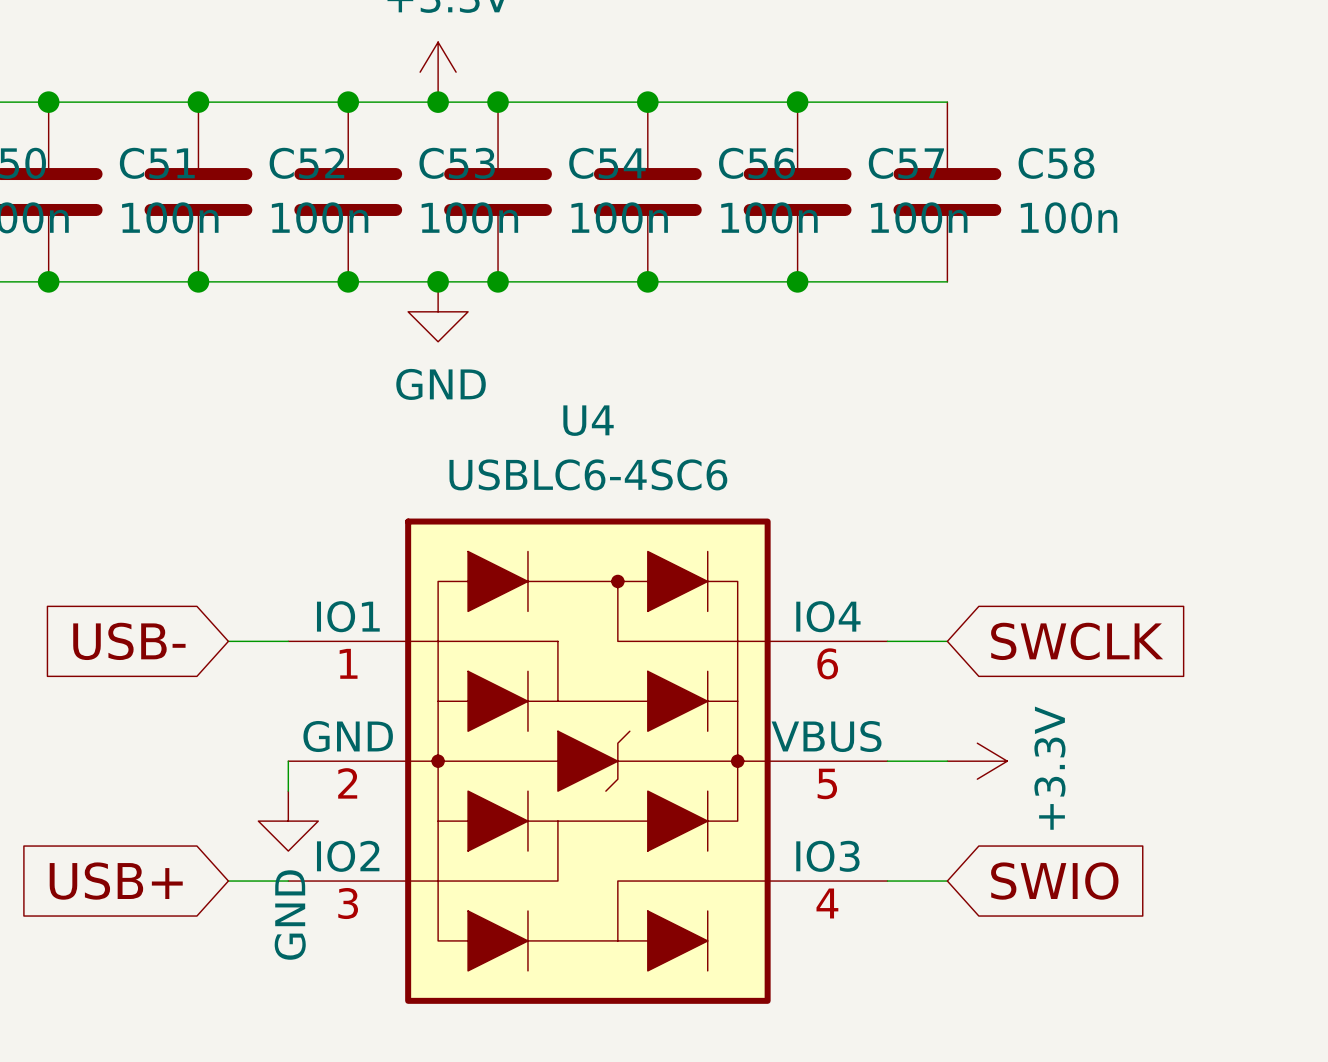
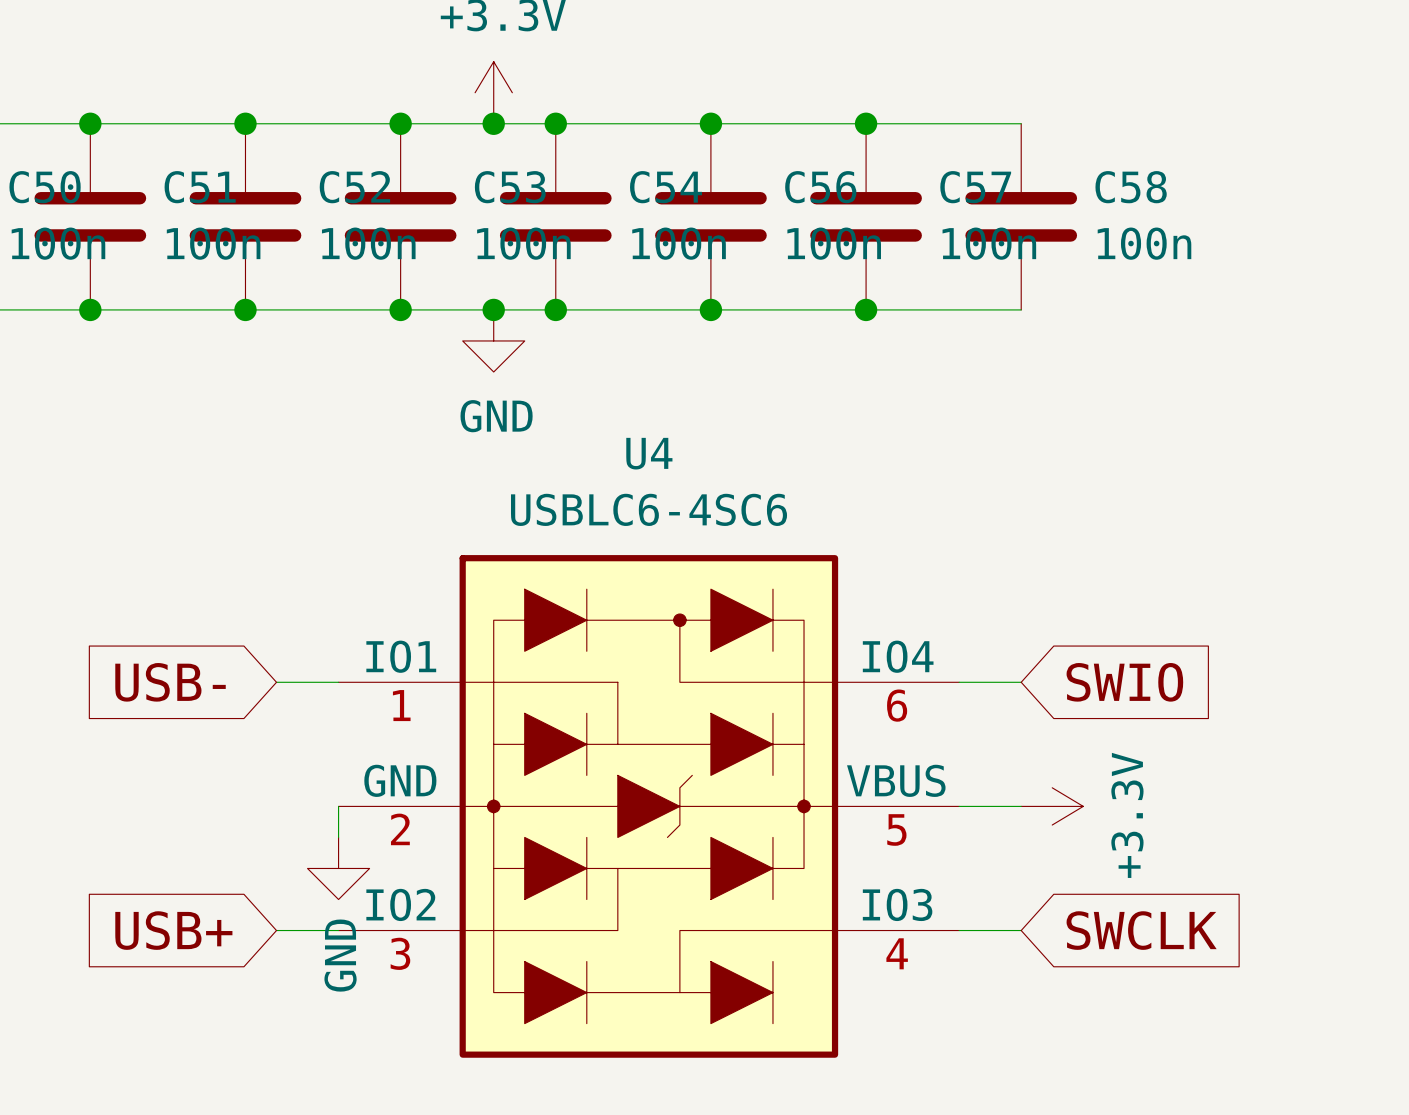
global label: SWCLK (1077, 641) -> SWIO (1124, 682)
global label: SWIO (1054, 881) -> SWCLK (1141, 930)

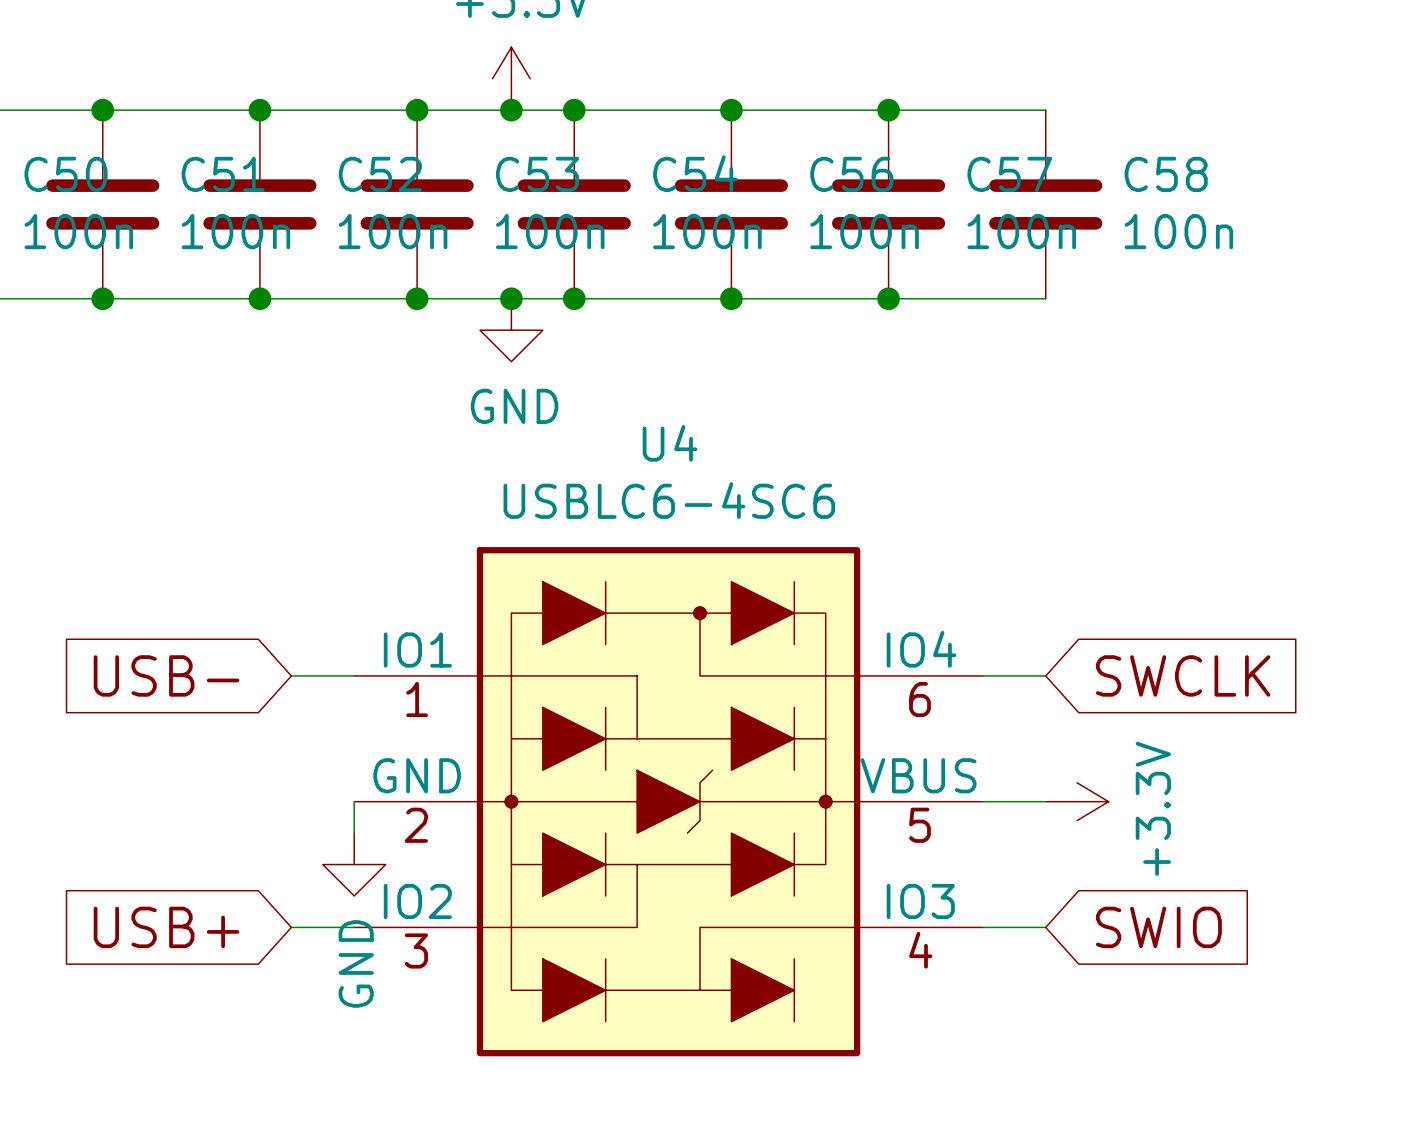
global label: SWIO (1124, 682) -> SWCLK (1183, 675)
global label: SWCLK (1141, 930) -> SWIO (1158, 927)

